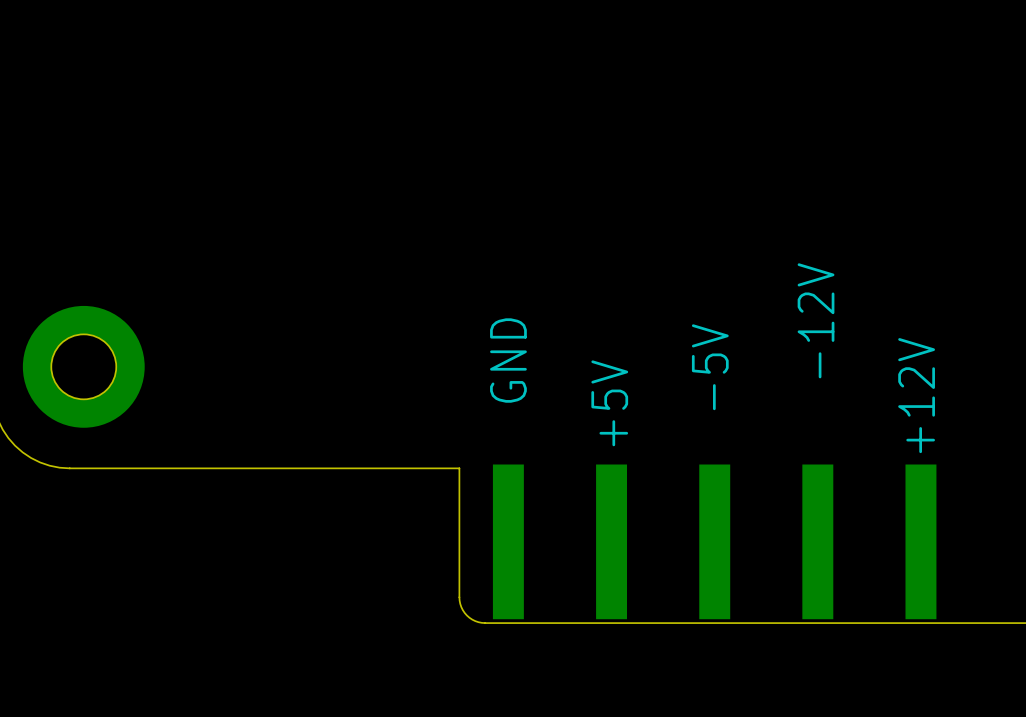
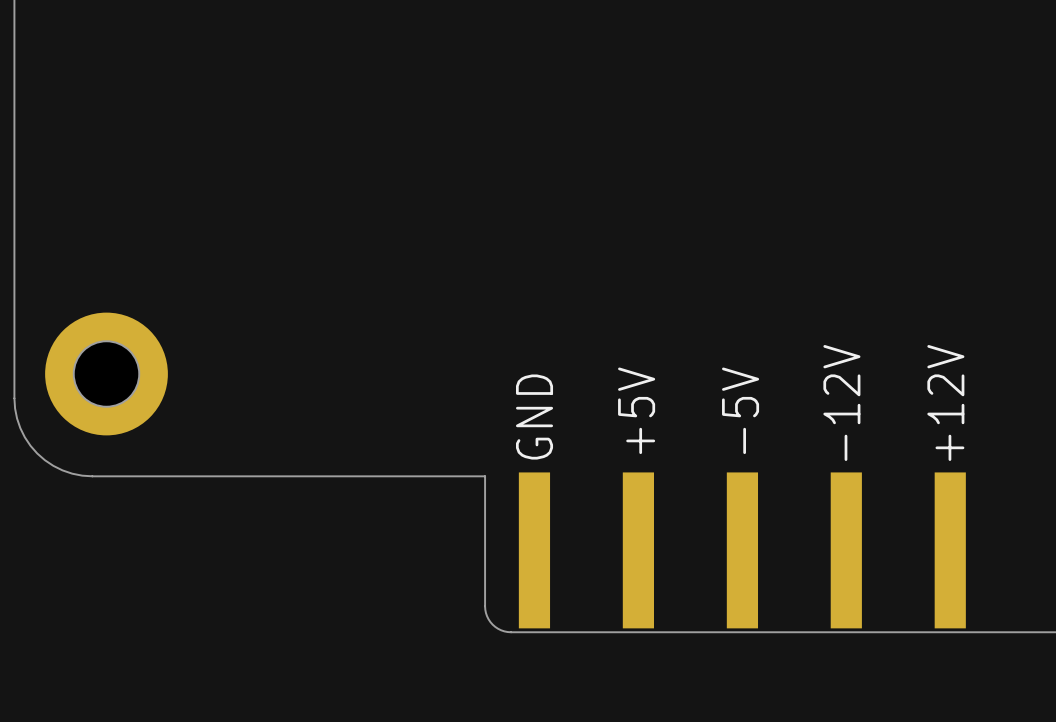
text position: -12V (816, 320) -> -12V (841, 402)
text position: GND (508, 360) -> GND (534, 417)
text position: -5V (710, 367) -> -5V (740, 410)

